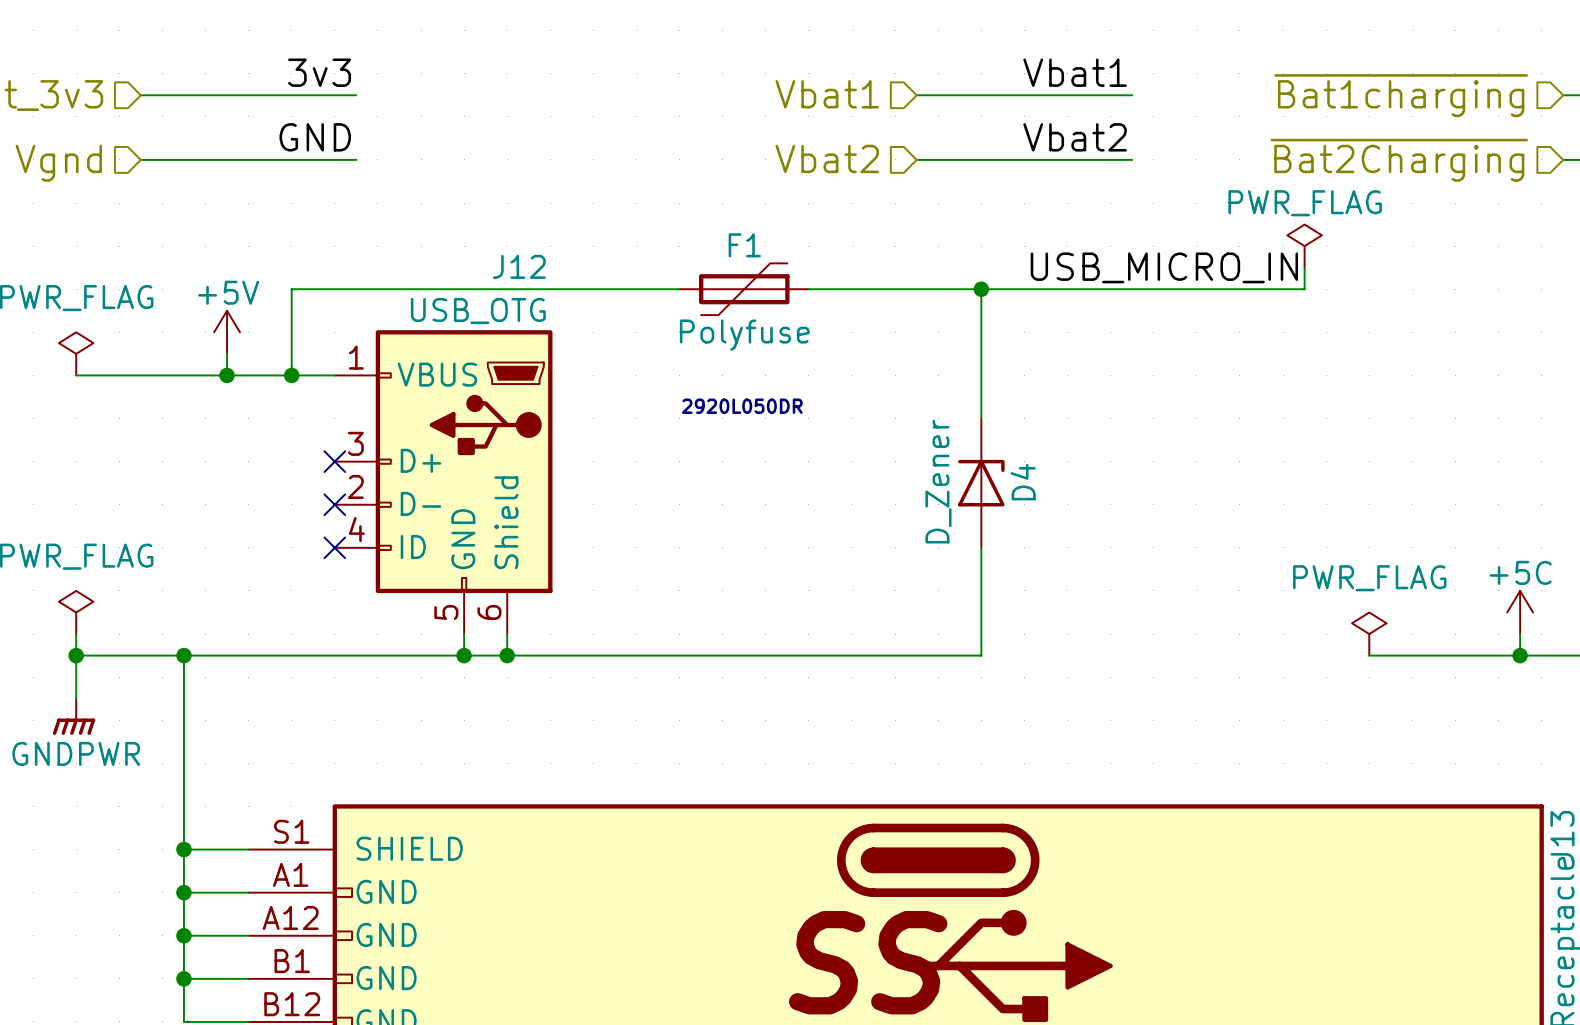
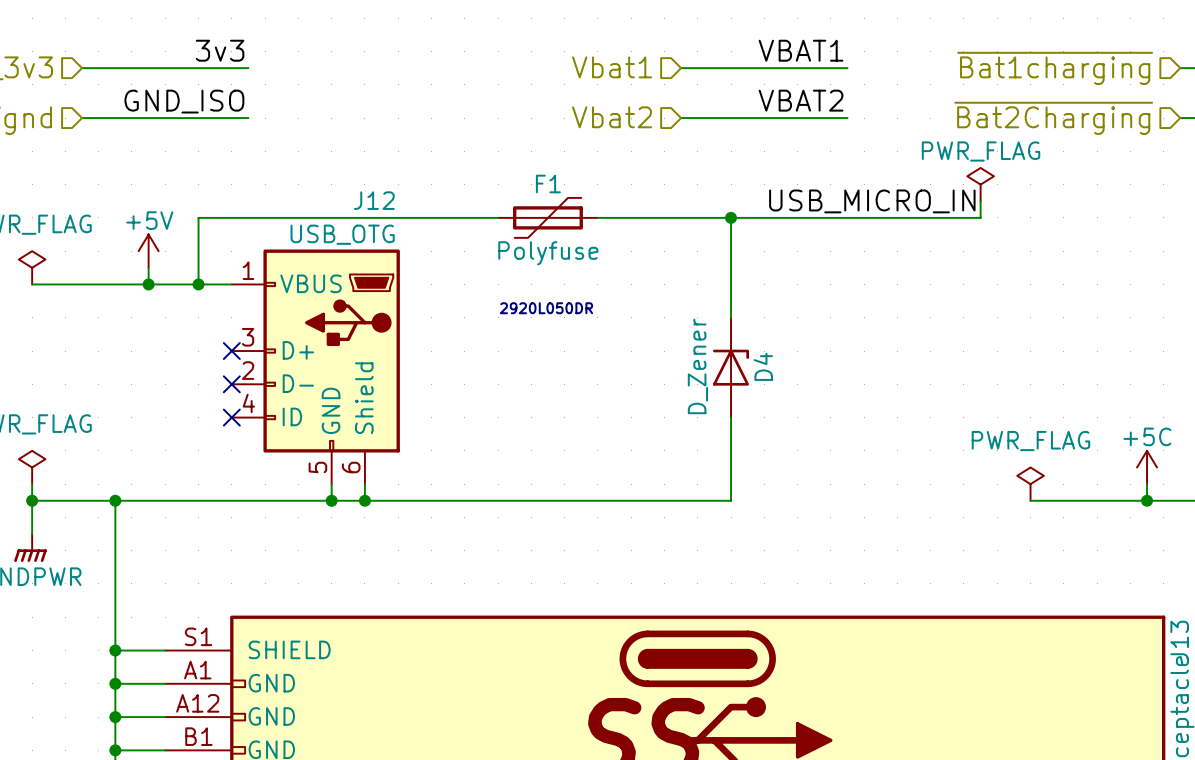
label: Vbat1 (1075, 72) -> VBAT1 (801, 50)
label: GND (315, 137) -> GND_ISO (184, 101)
label: Vbat2 (1075, 137) -> VBAT2 (801, 100)

